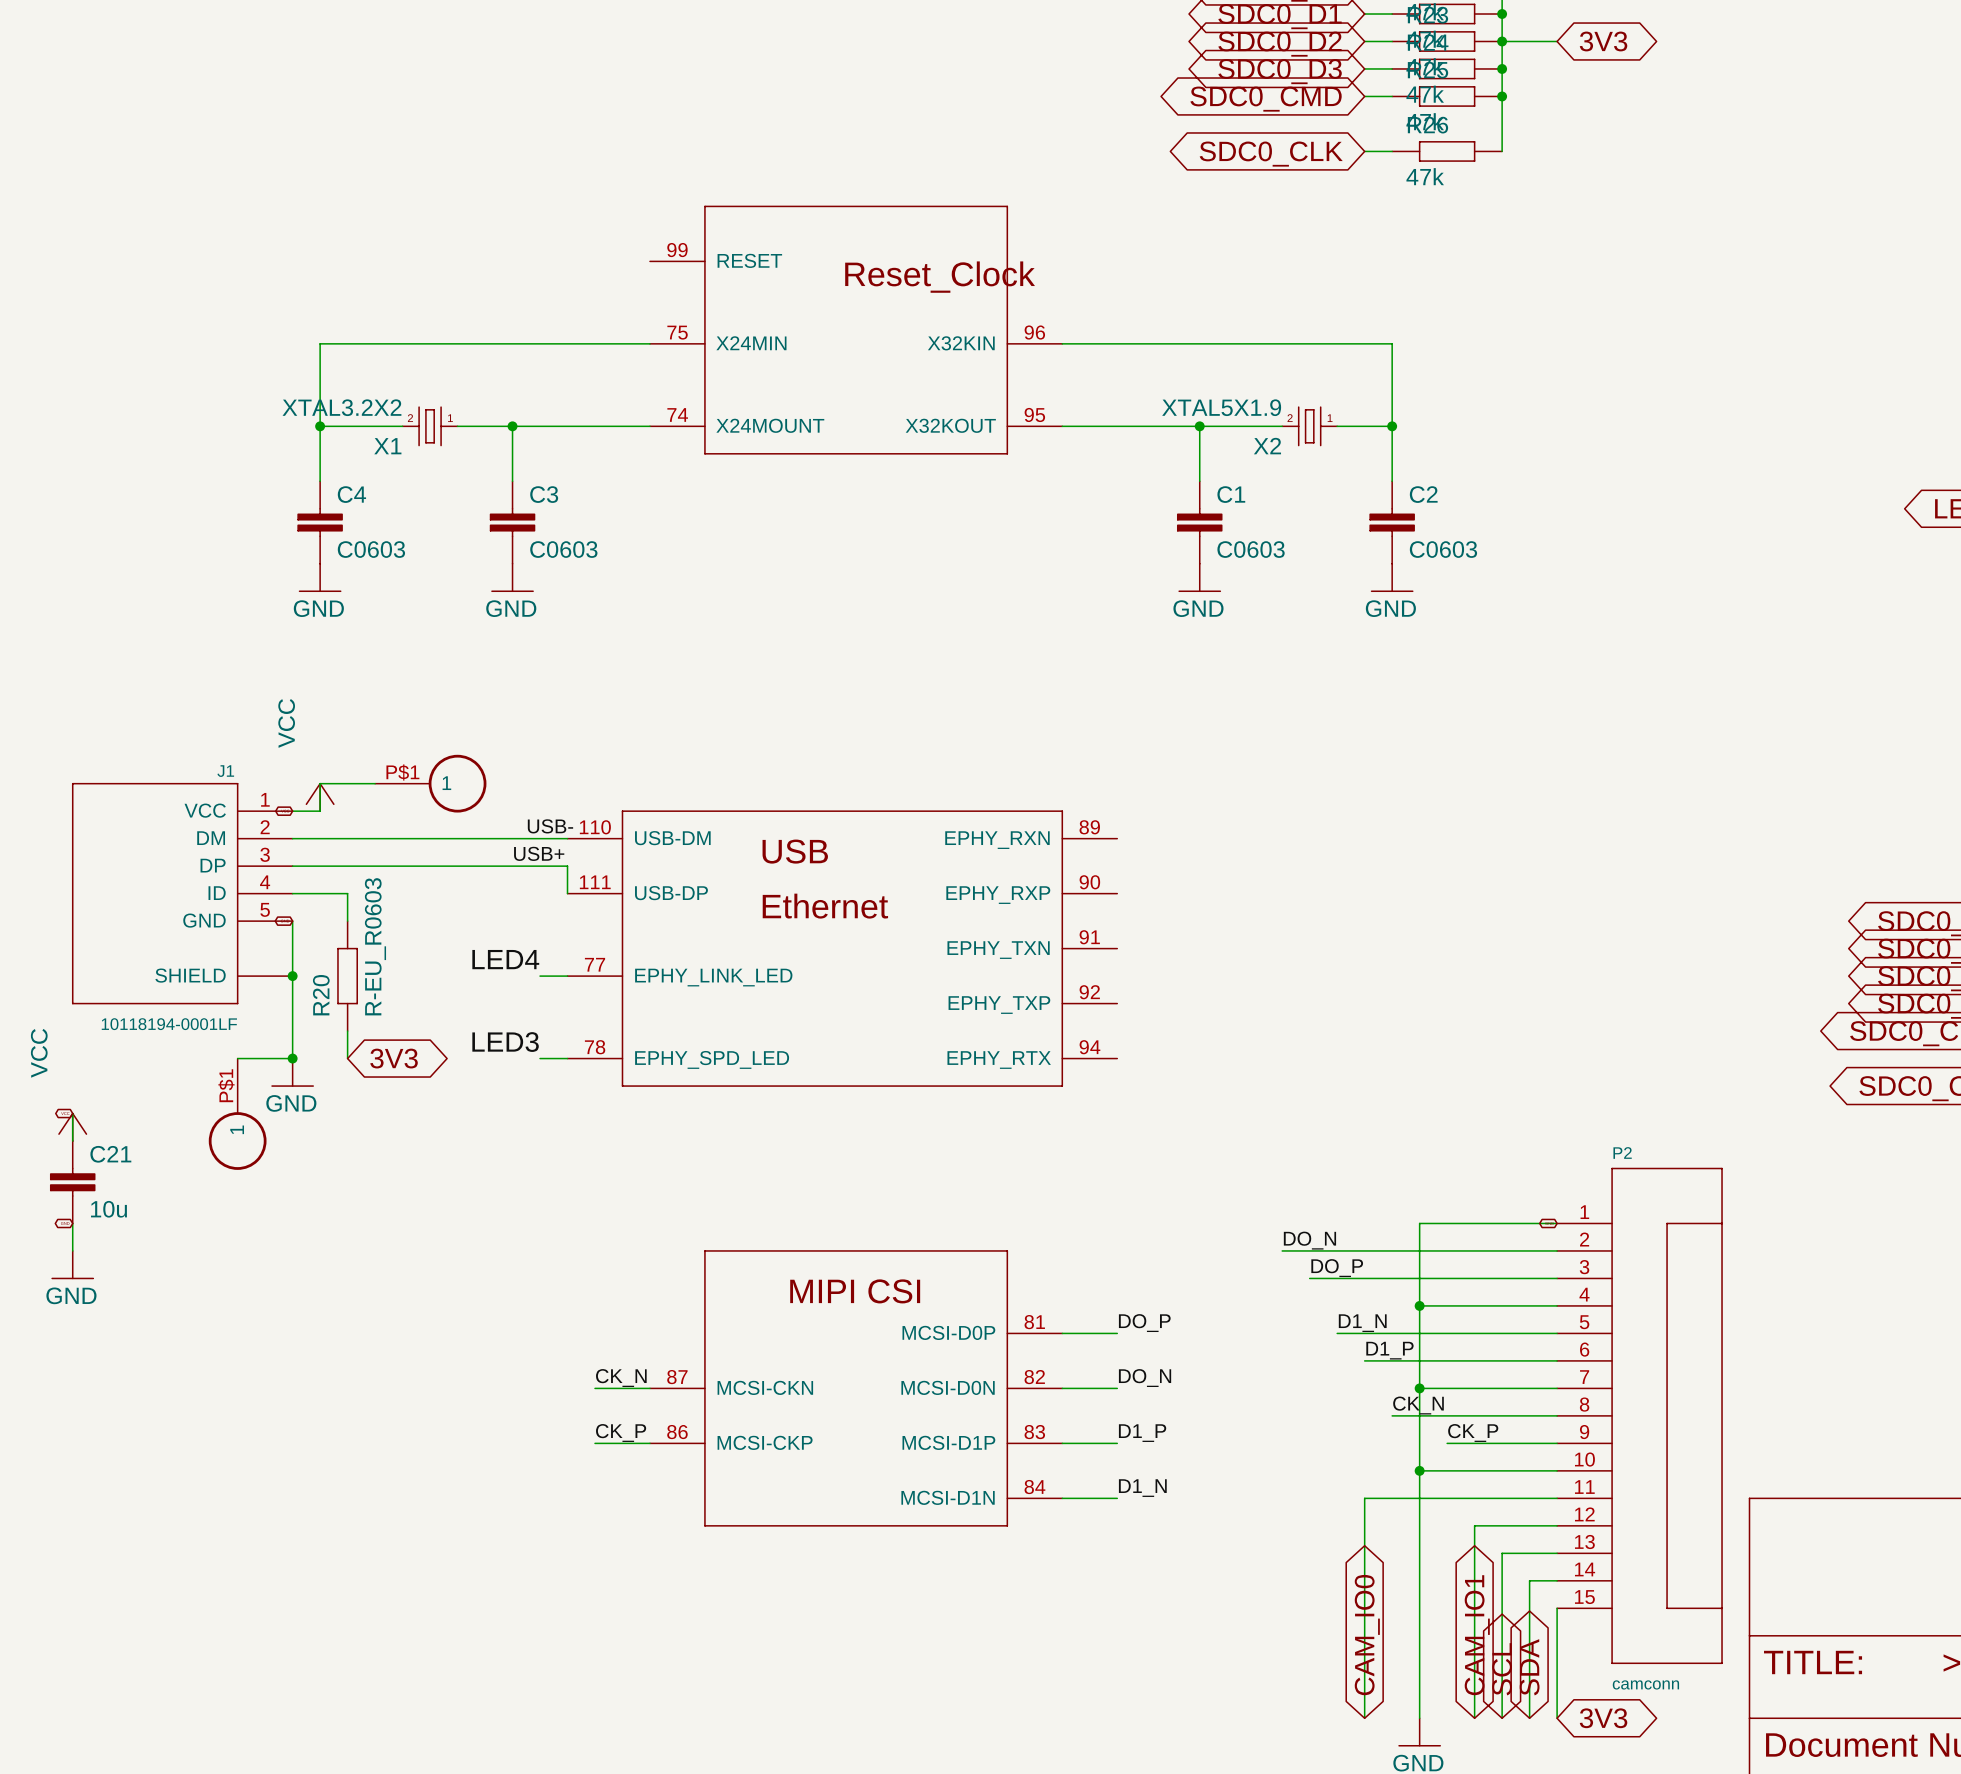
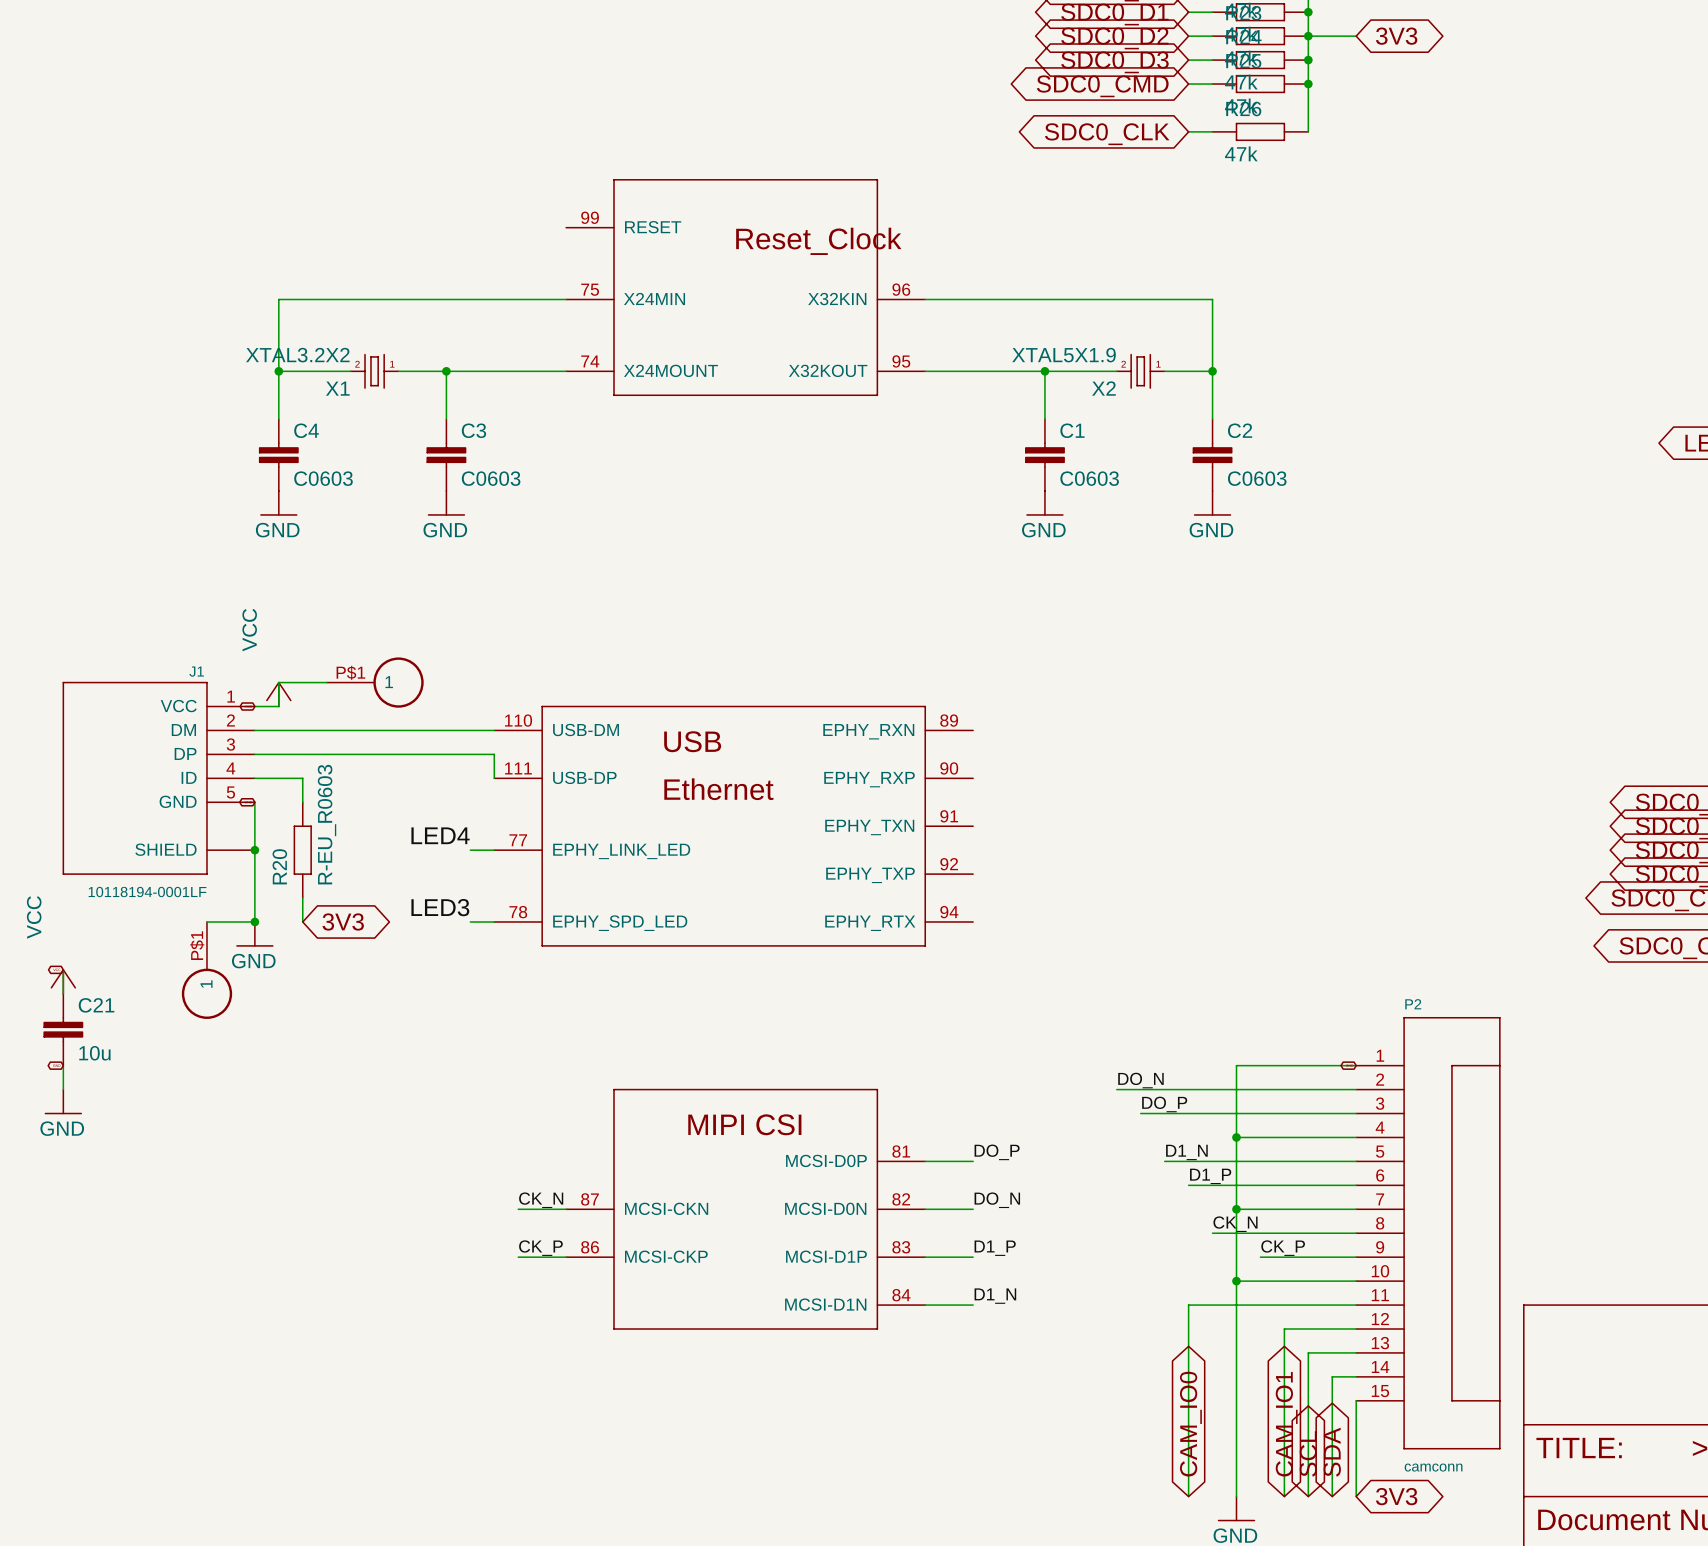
label: USB- (550, 826) -> none
label: USB+ (539, 853) -> none

